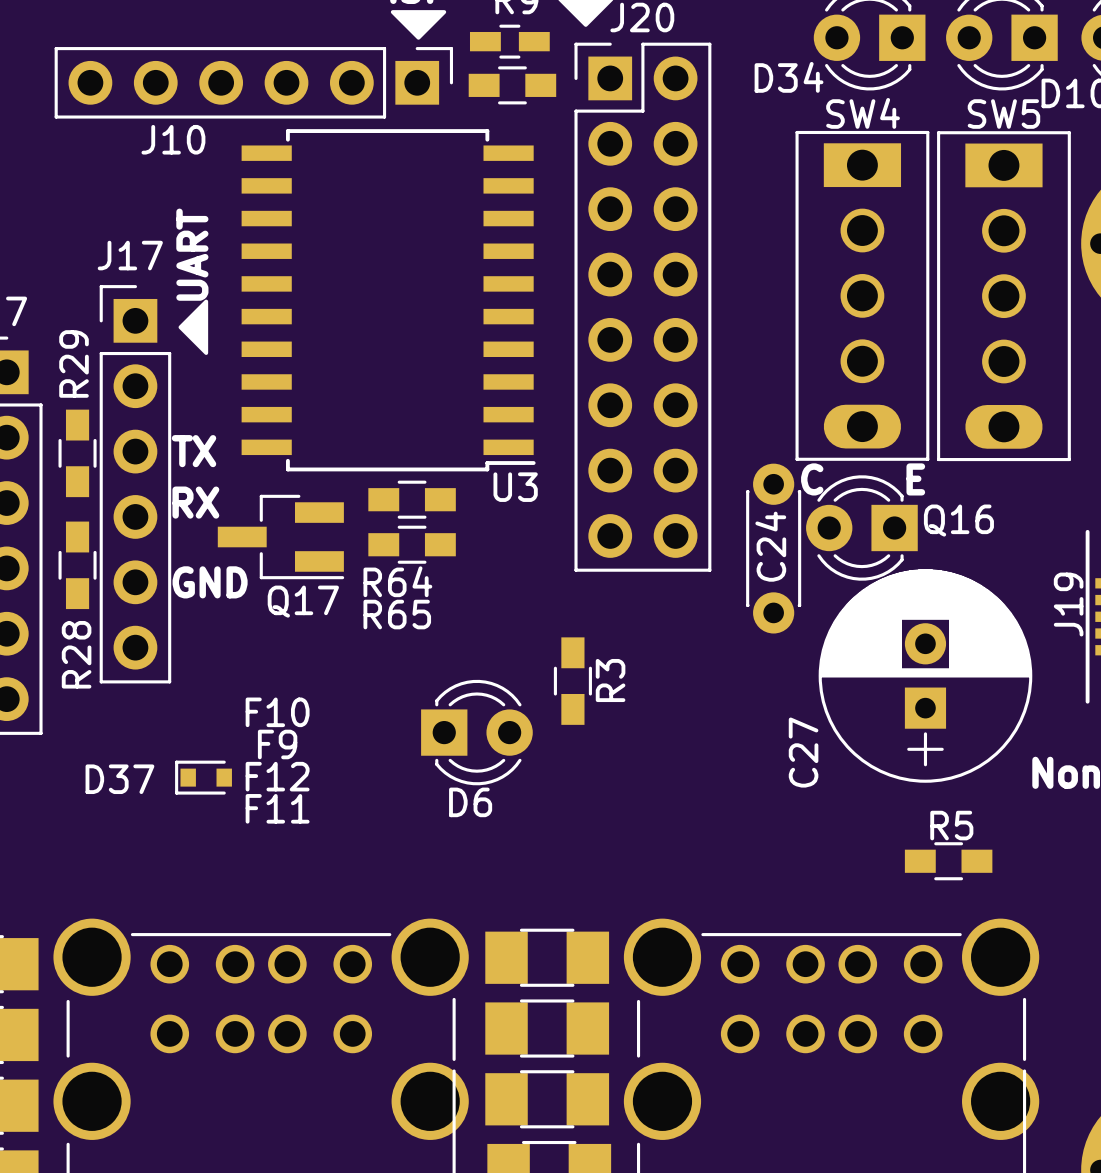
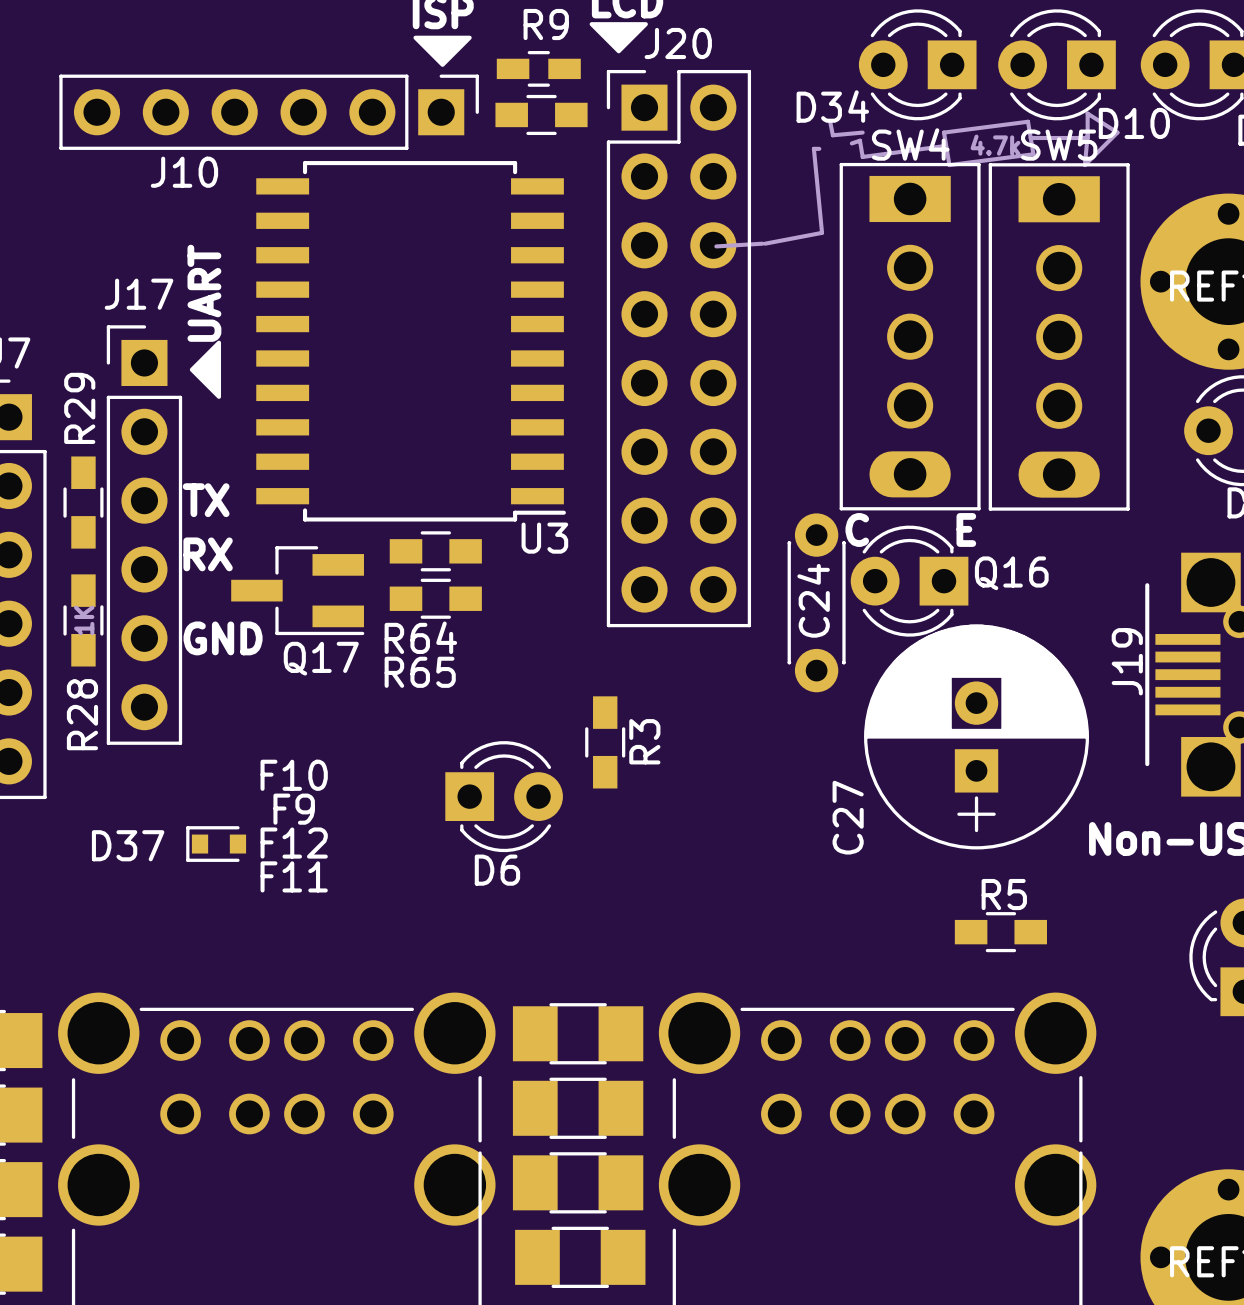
line: none -> (830, 121) (832, 135) (862, 132)
line: none -> (1028, 121) (944, 132) (949, 165) (1033, 154) (1028, 121)
line: none -> (1087, 135) (1084, 165) (1117, 132) (1087, 113) (1087, 138) (1030, 138)
line: none -> (851, 143) (859, 140) (862, 156) (944, 146)
text: none -> 4.7k (995, 145)
line: none -> (819, 148) (813, 148) (822, 232) (765, 243)
line: none -> (762, 243) (716, 246)
text: none -> 1K (84, 620)

